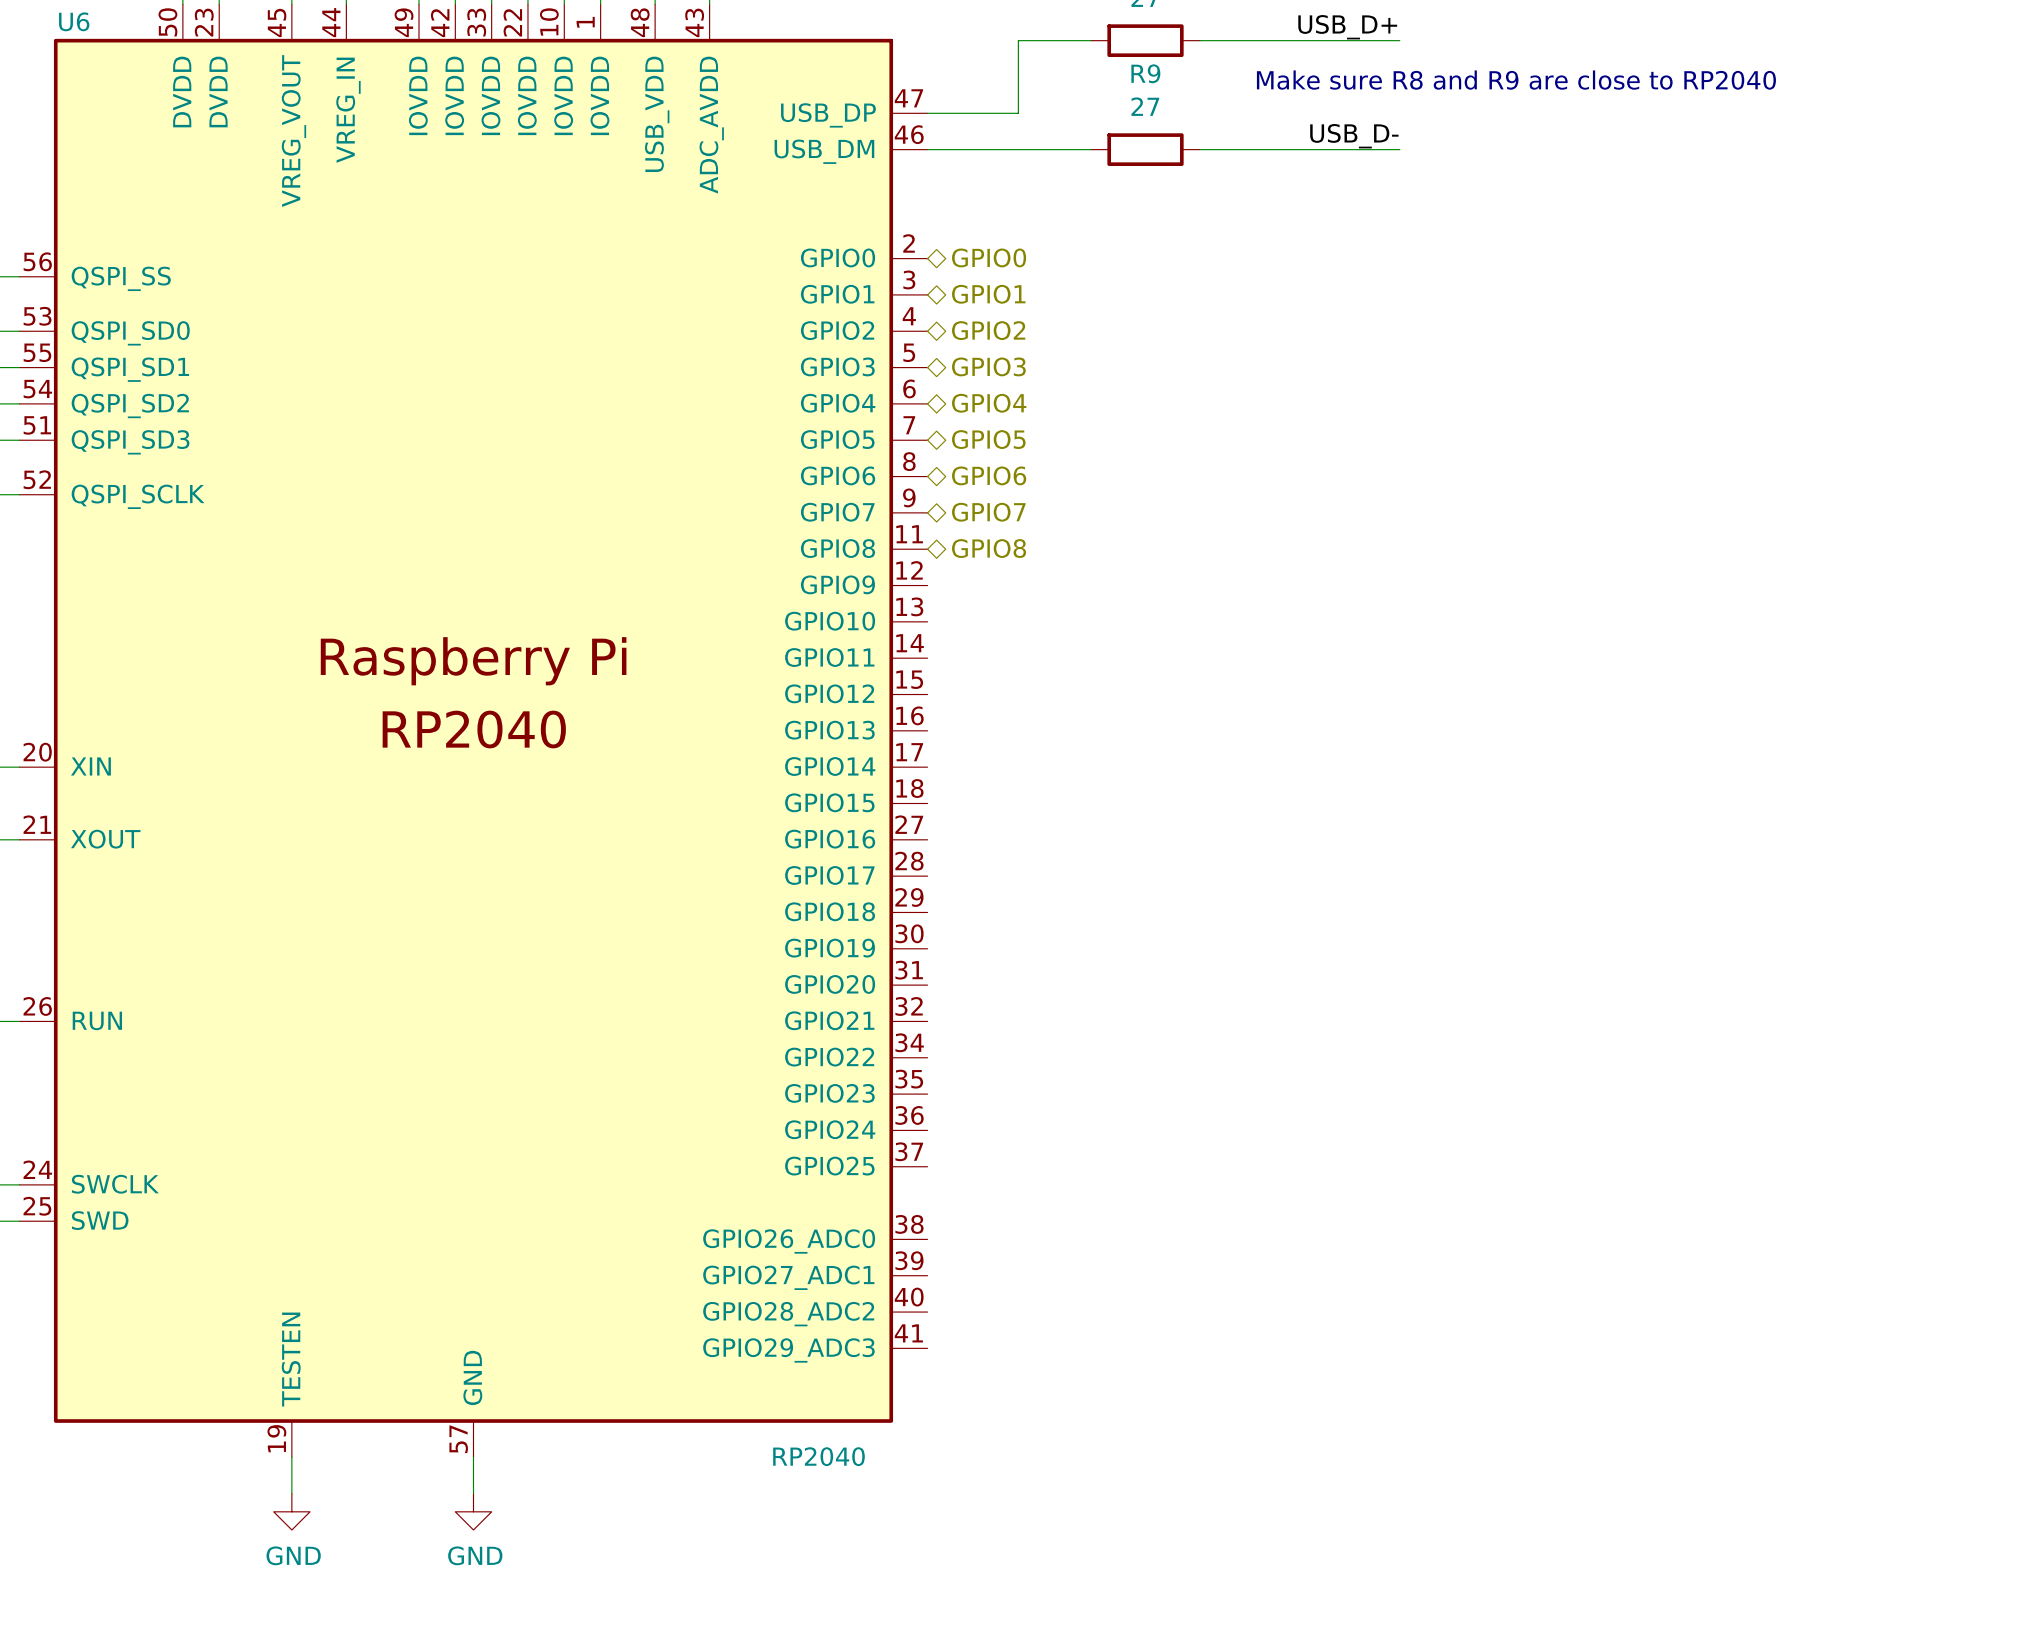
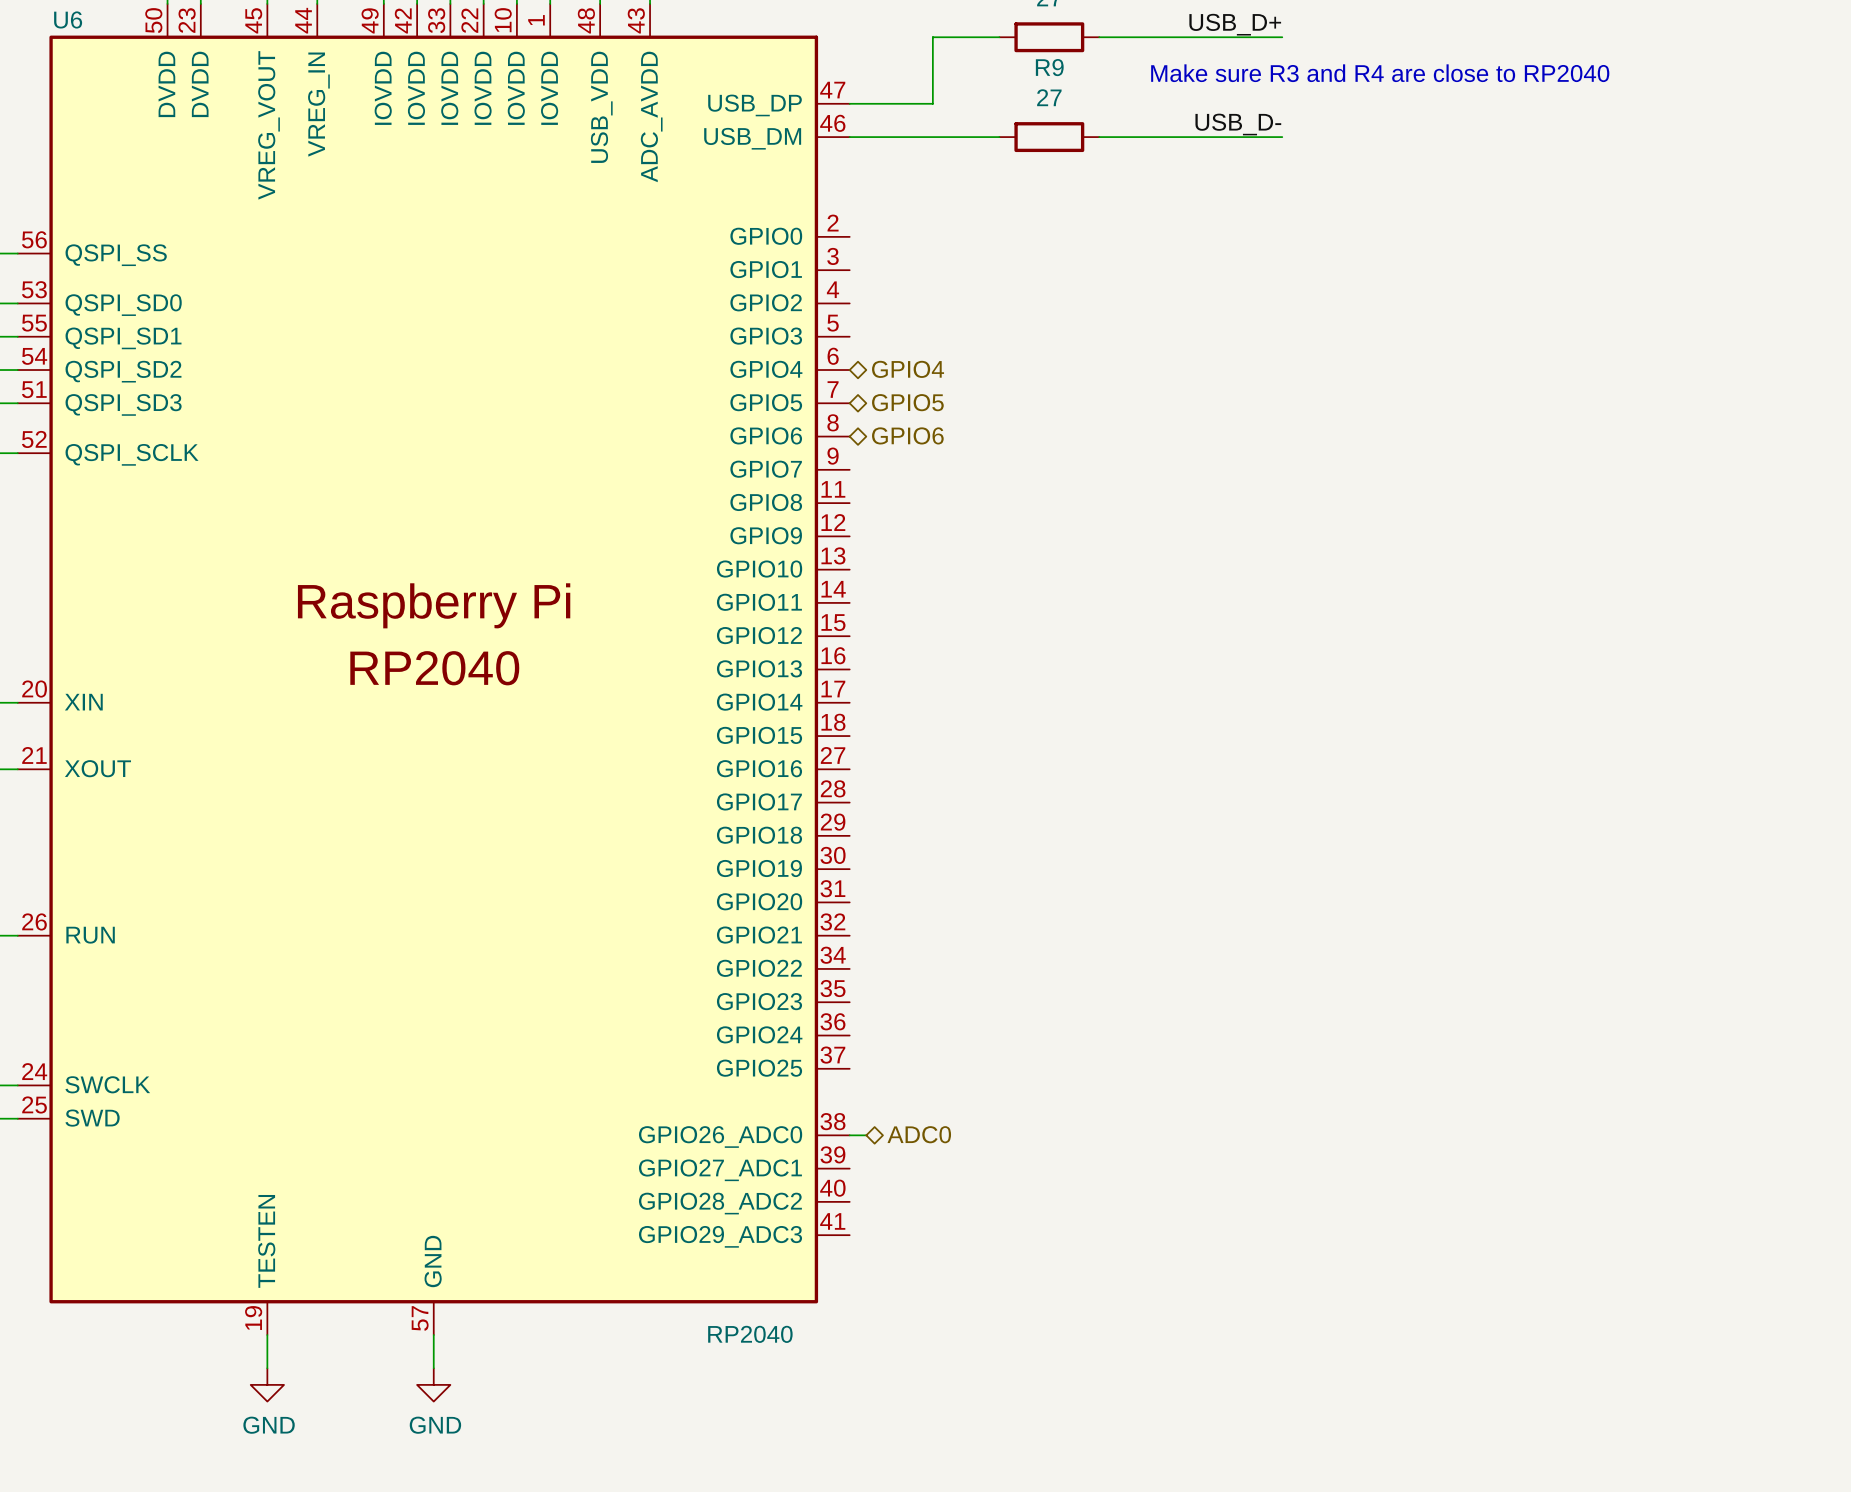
text: Make sure R8 and R9 are close to RP2040 (1516, 80) -> Make sure R3 and R4 are close to RP2040 (1380, 73)
hierarchical label: GPIO0 (989, 257) -> none
hierarchical label: GPIO1 (988, 294) -> none
hierarchical label: GPIO2 (988, 330) -> none
hierarchical label: GPIO3 (988, 366) -> none
hierarchical label: GPIO7 (988, 512) -> none
hierarchical label: GPIO8 (989, 548) -> none
hierarchical label: none -> ADC0 (919, 1134)
wire: none -> (849, 1135) (866, 1135)

